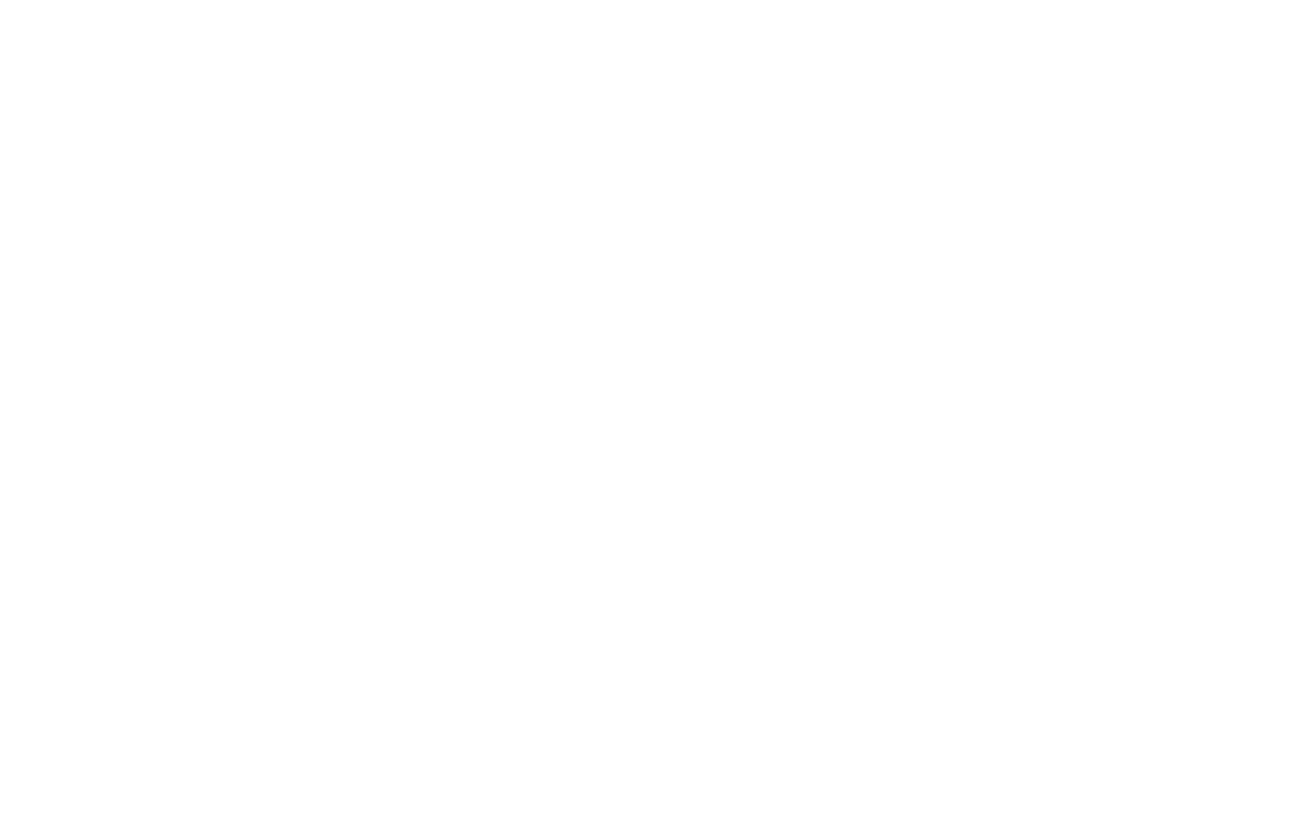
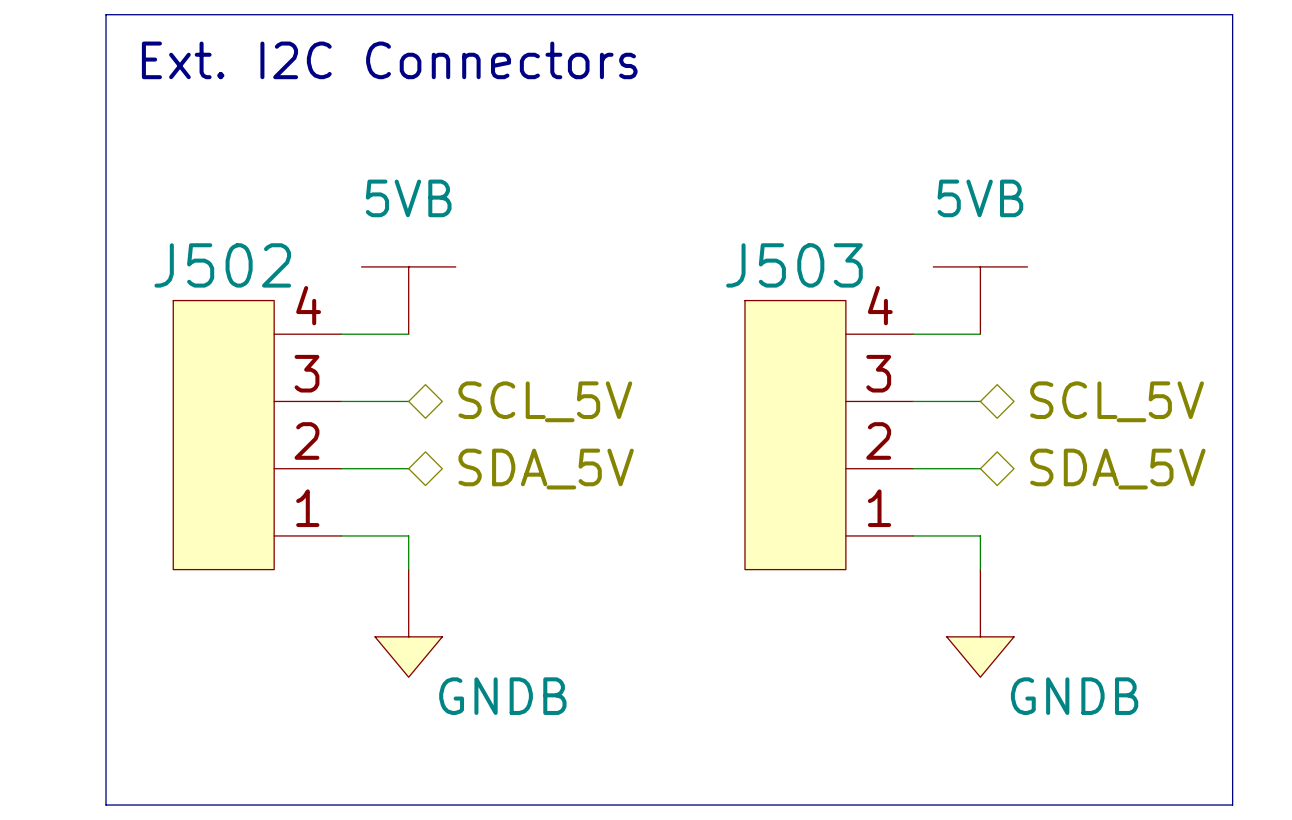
line: none -> (106, 14) (1232, 14) (1232, 805) (106, 805) (106, 14)
text: none -> Ext. I2C Connectors (389, 60)
power symbol: none -> 5VB (408, 300)
power symbol: none -> 5VB (980, 300)
wire: none -> (341, 334) (408, 334)
wire: none -> (913, 334) (980, 334)
wire: none -> (341, 401) (408, 401)
hierarchical label: none -> SCL_5V (545, 401)
wire: none -> (913, 401) (980, 401)
hierarchical label: none -> SCL_5V (1117, 401)
J502: none -> (257, 435)
J503: none -> (829, 435)
wire: none -> (341, 468) (408, 468)
wire: none -> (913, 468) (980, 468)
hierarchical label: none -> SDA_5V (546, 469)
hierarchical label: none -> SDA_5V (1117, 469)
wire: none -> (341, 535) (408, 535) (408, 569)
wire: none -> (913, 535) (980, 535) (980, 569)
power symbol: none -> GNDB (408, 623)
power symbol: none -> GNDB (980, 623)

